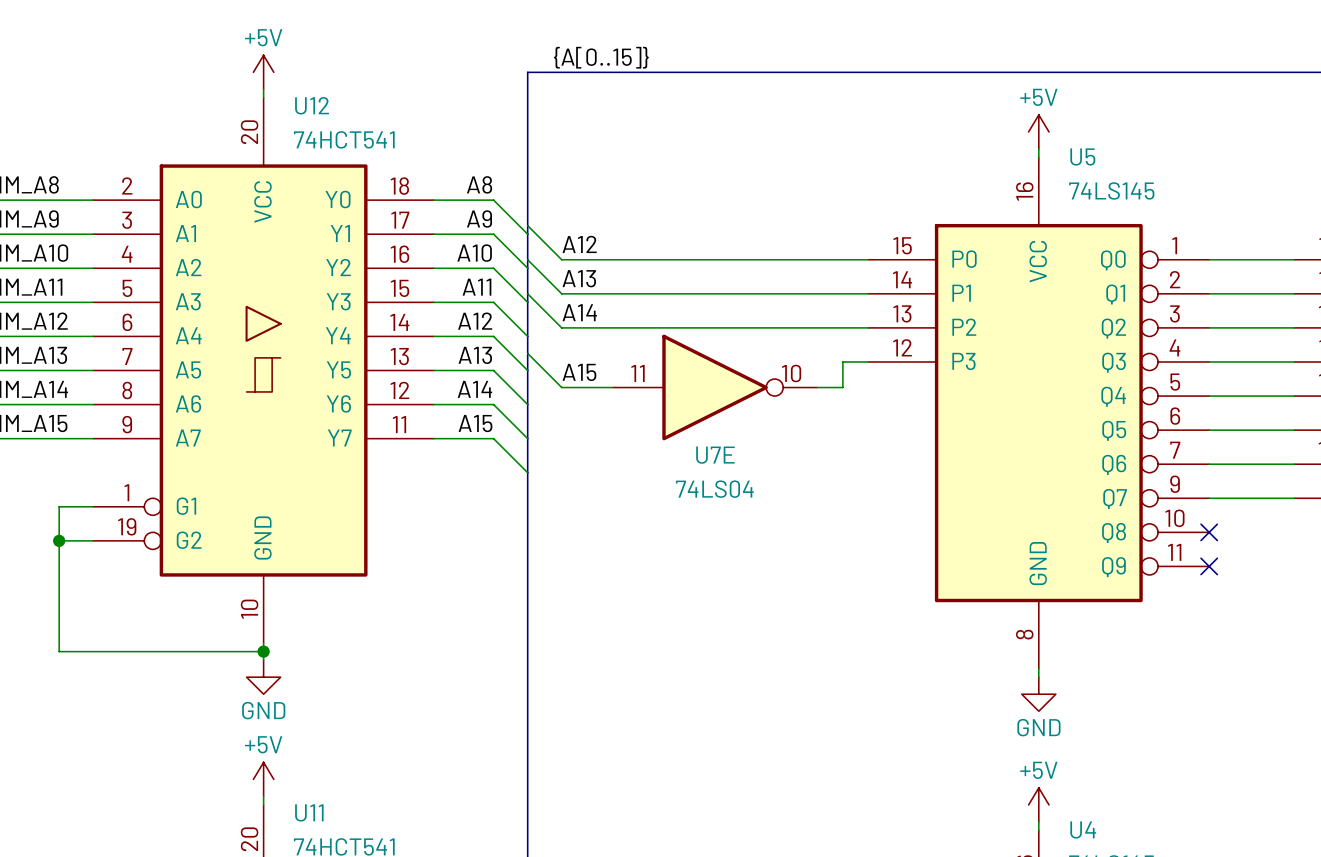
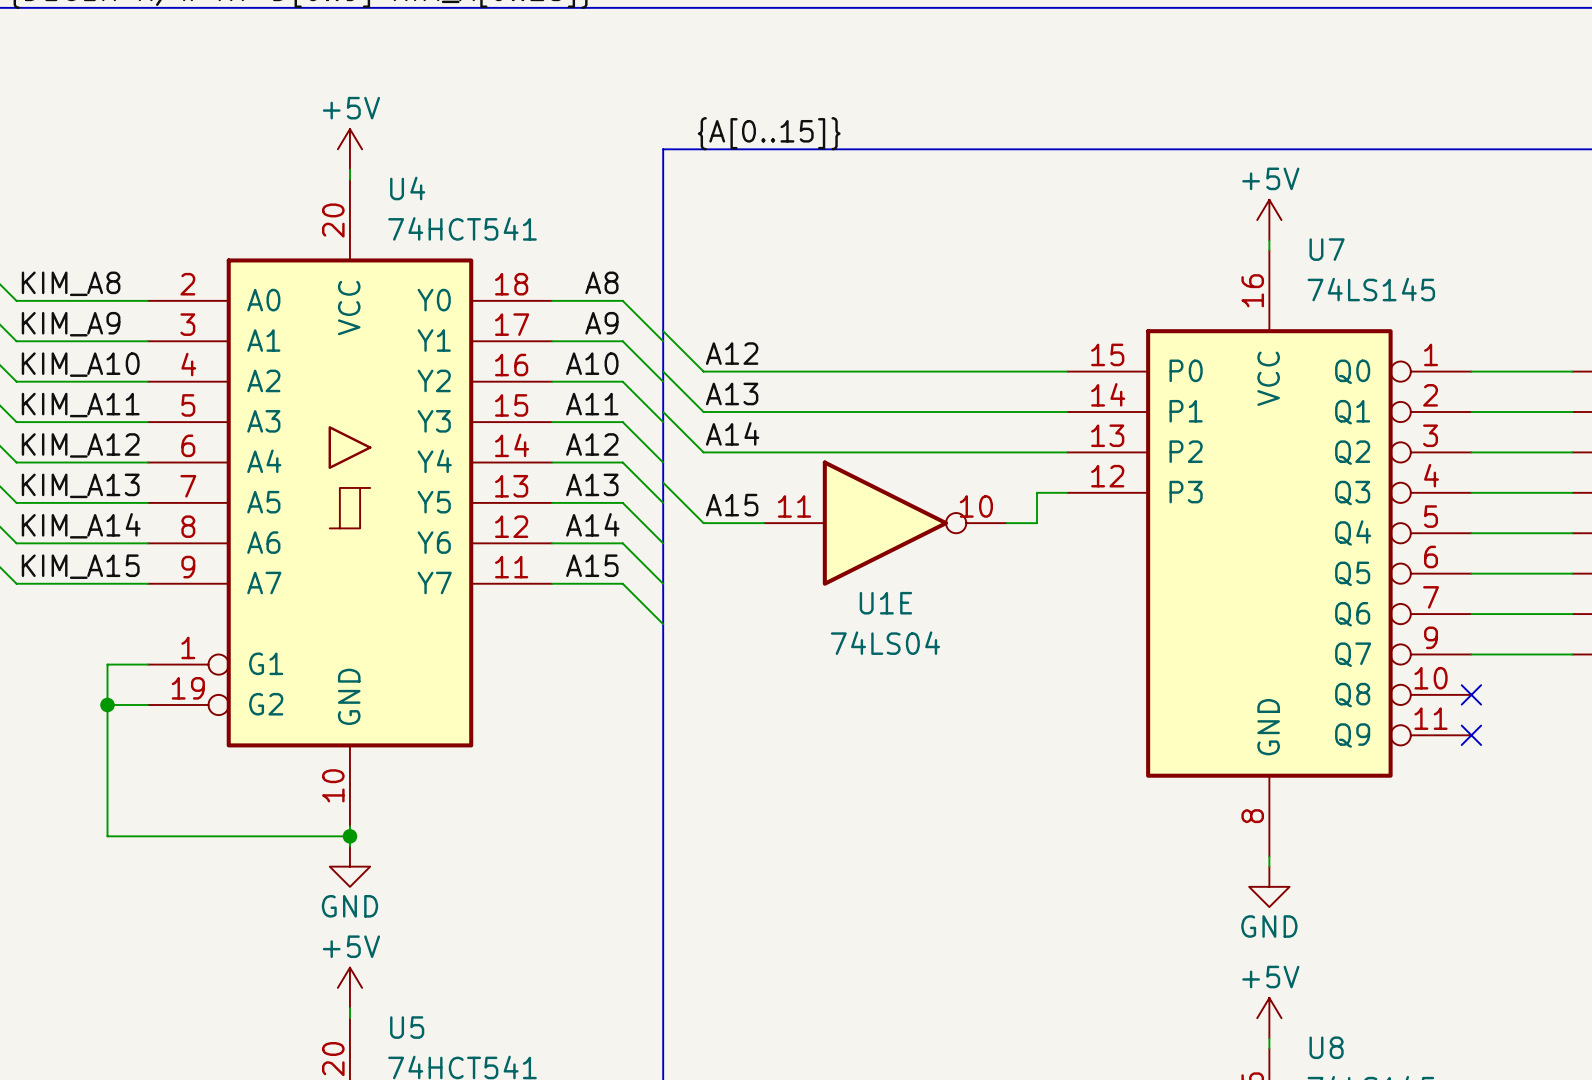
U12 name: U12 (312, 105) -> U4 (407, 188)
U5 name: U5 (1082, 156) -> U7 (1327, 249)
U7E name: U7E (715, 455) -> U1E (885, 603)
U11 name: U11 (309, 812) -> U5 (407, 1027)
U4 name: U4 (1083, 829) -> U8 (1326, 1047)

